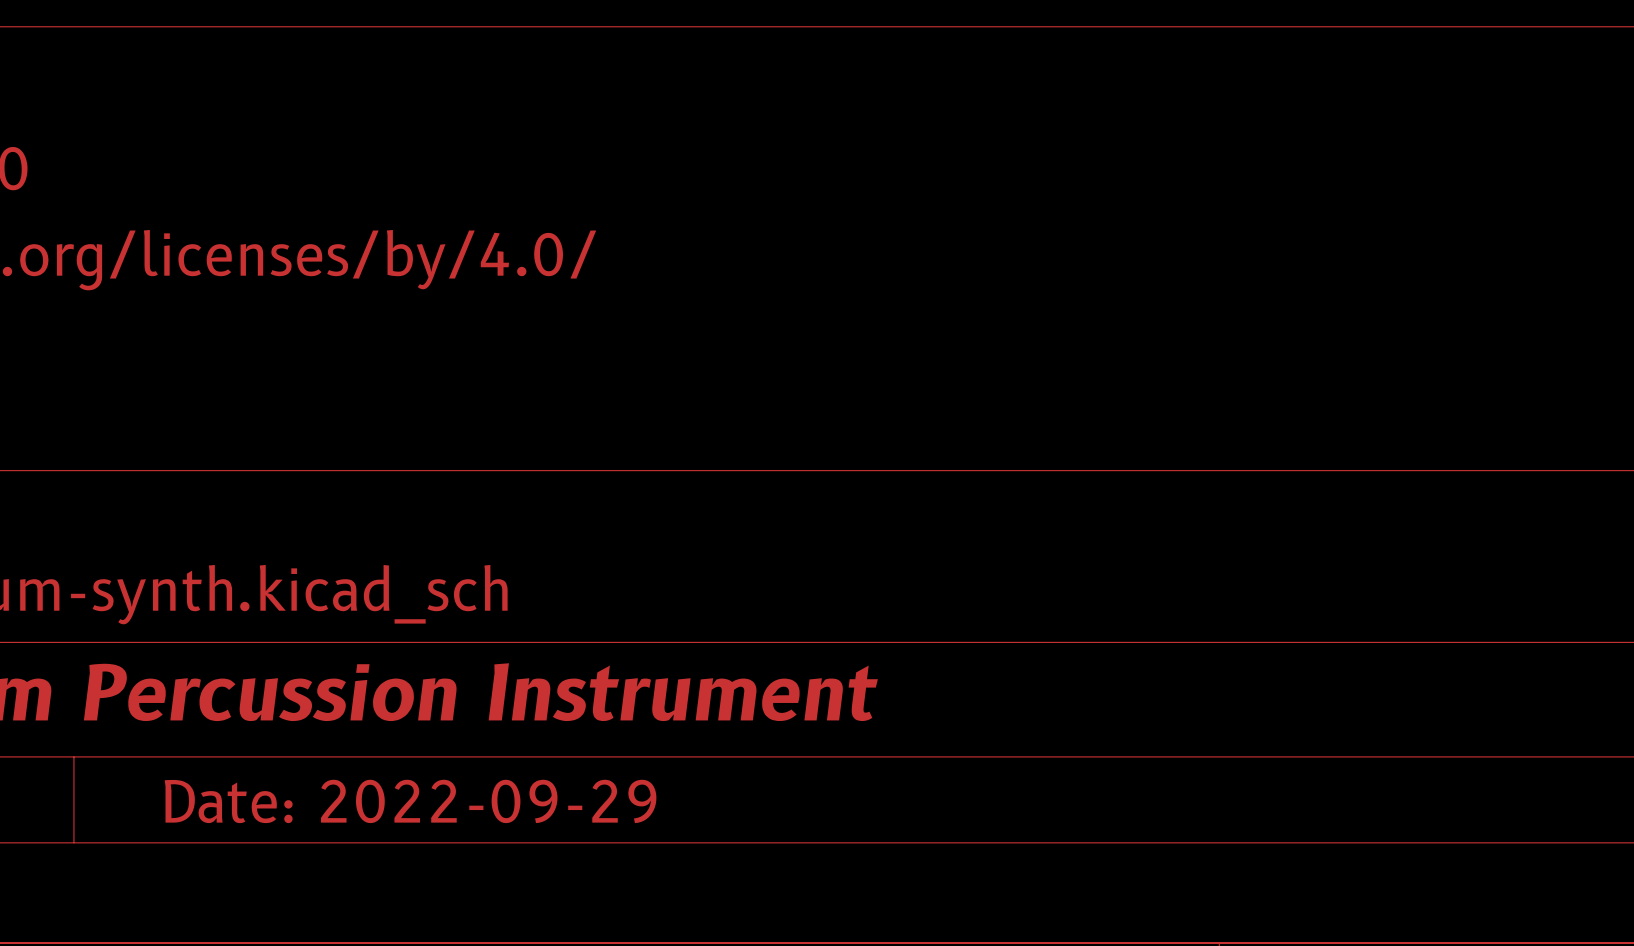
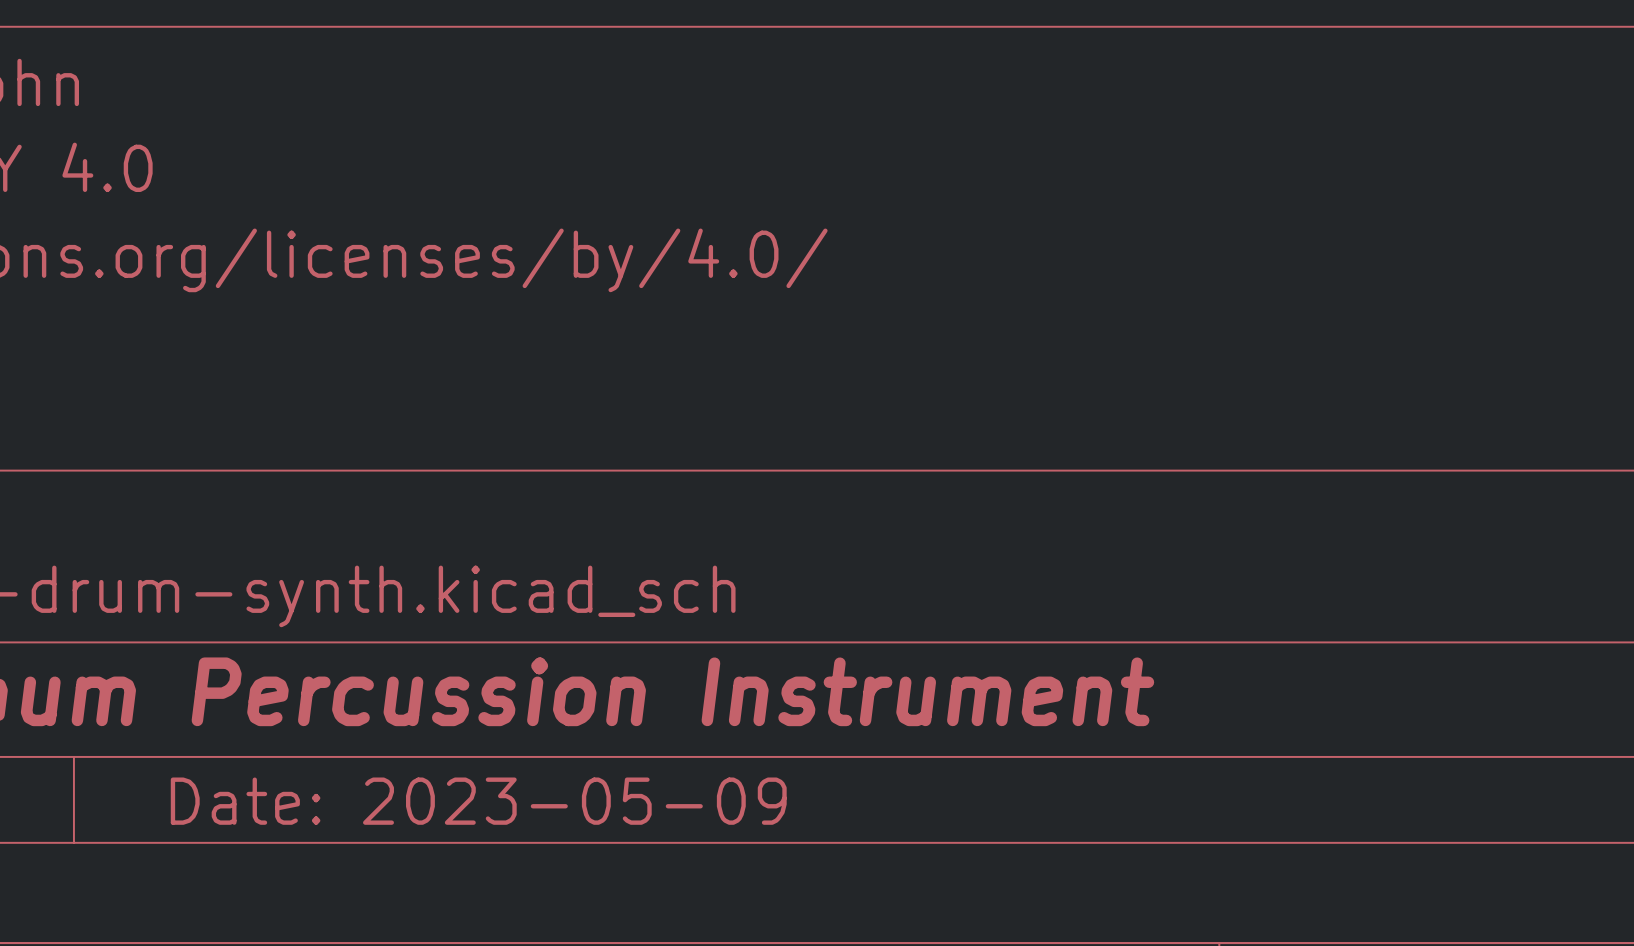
title block: Date: 2022-09-29 (410, 801) -> Date: 2023-05-09 (478, 801)

